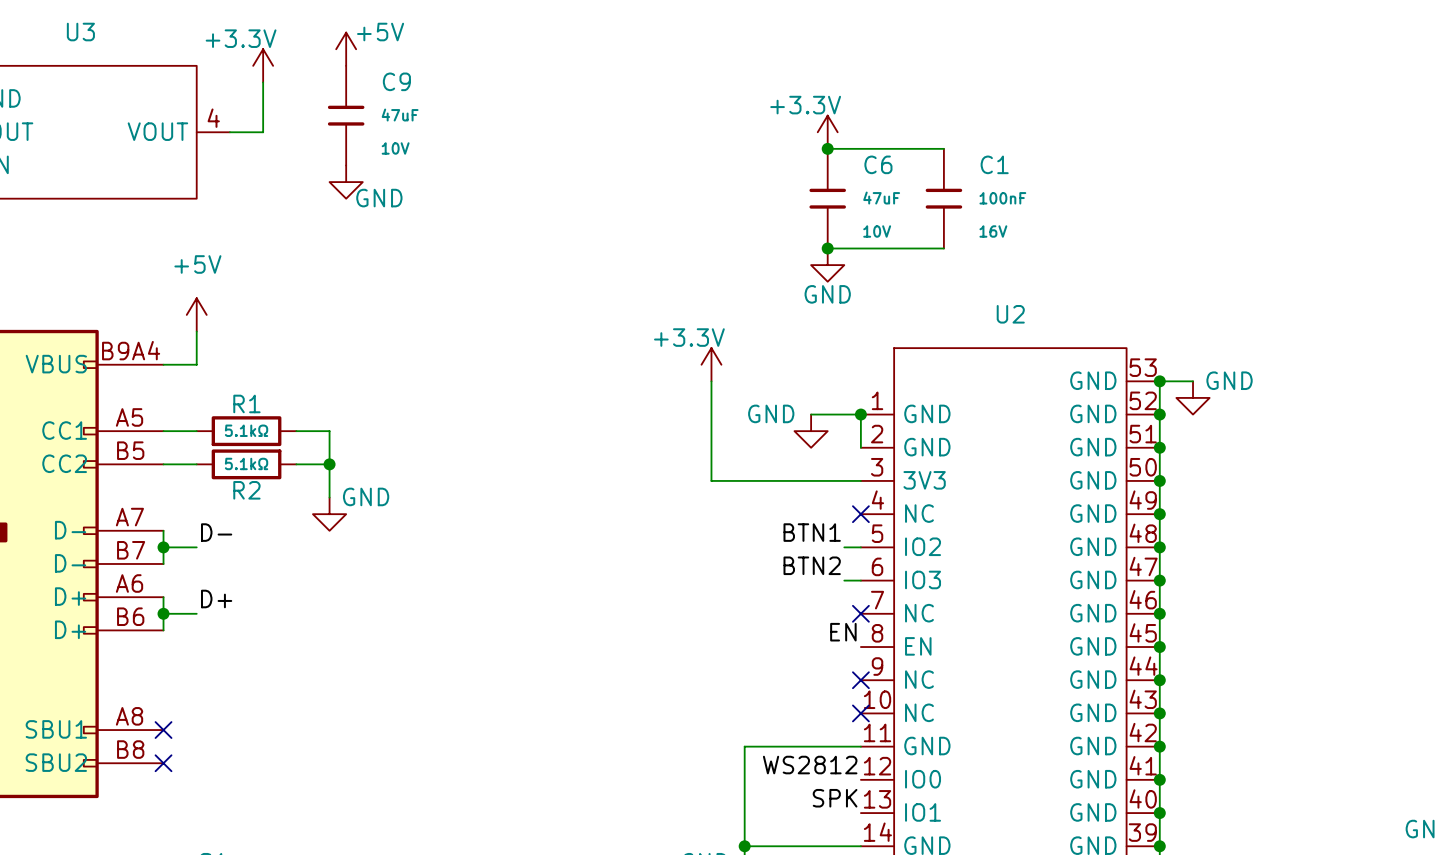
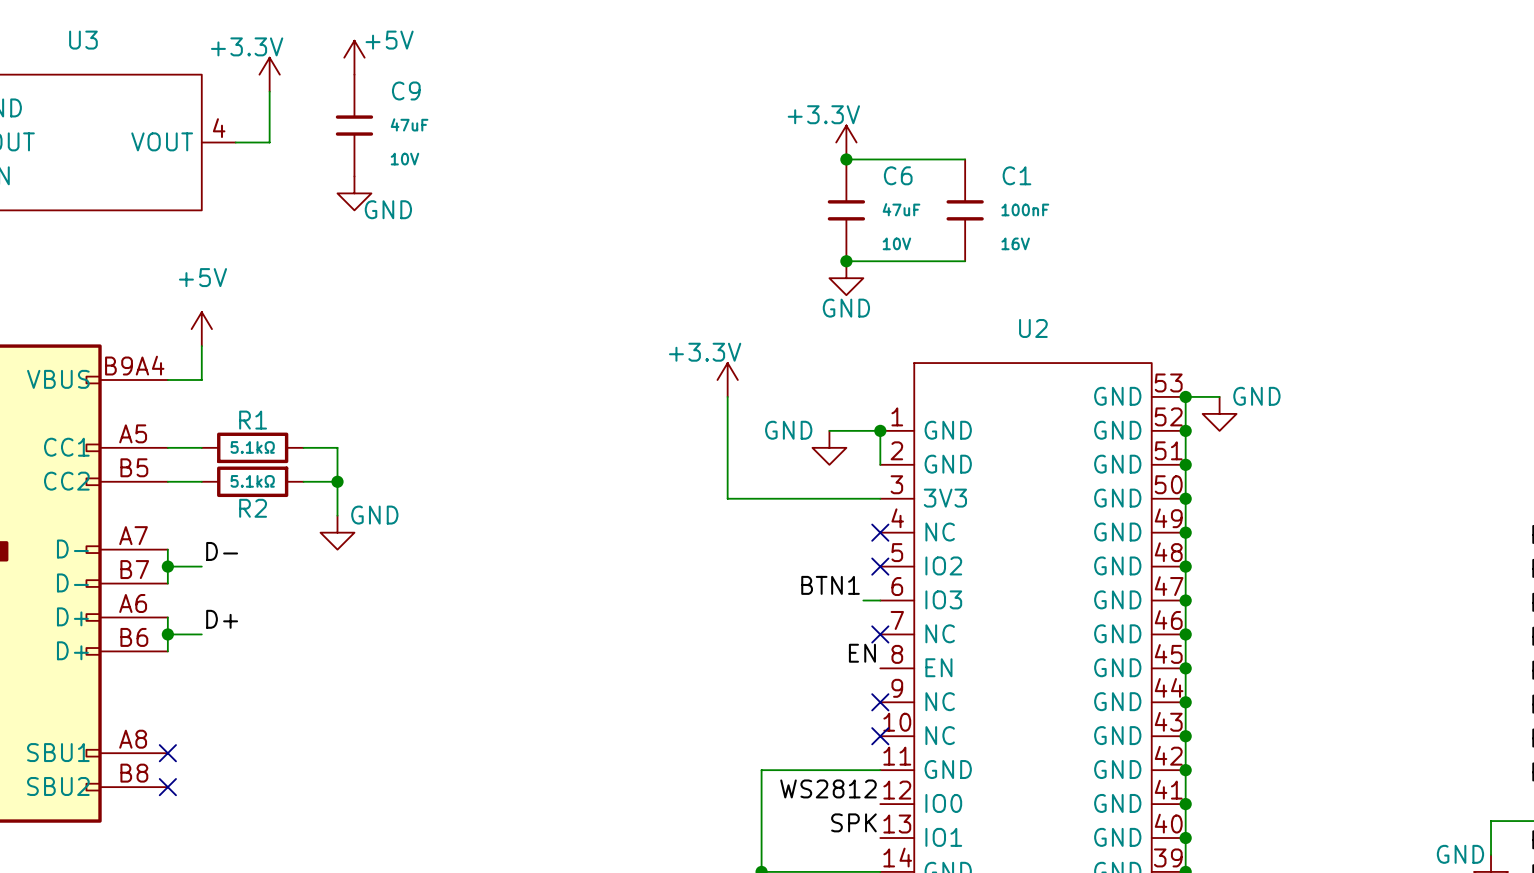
label: BTN1 (812, 532) -> none
wire: (844, 547) (860, 547) -> none
no-connect mark: none -> (880, 566)
label: BTN2 (812, 565) -> BTN1 (830, 585)

